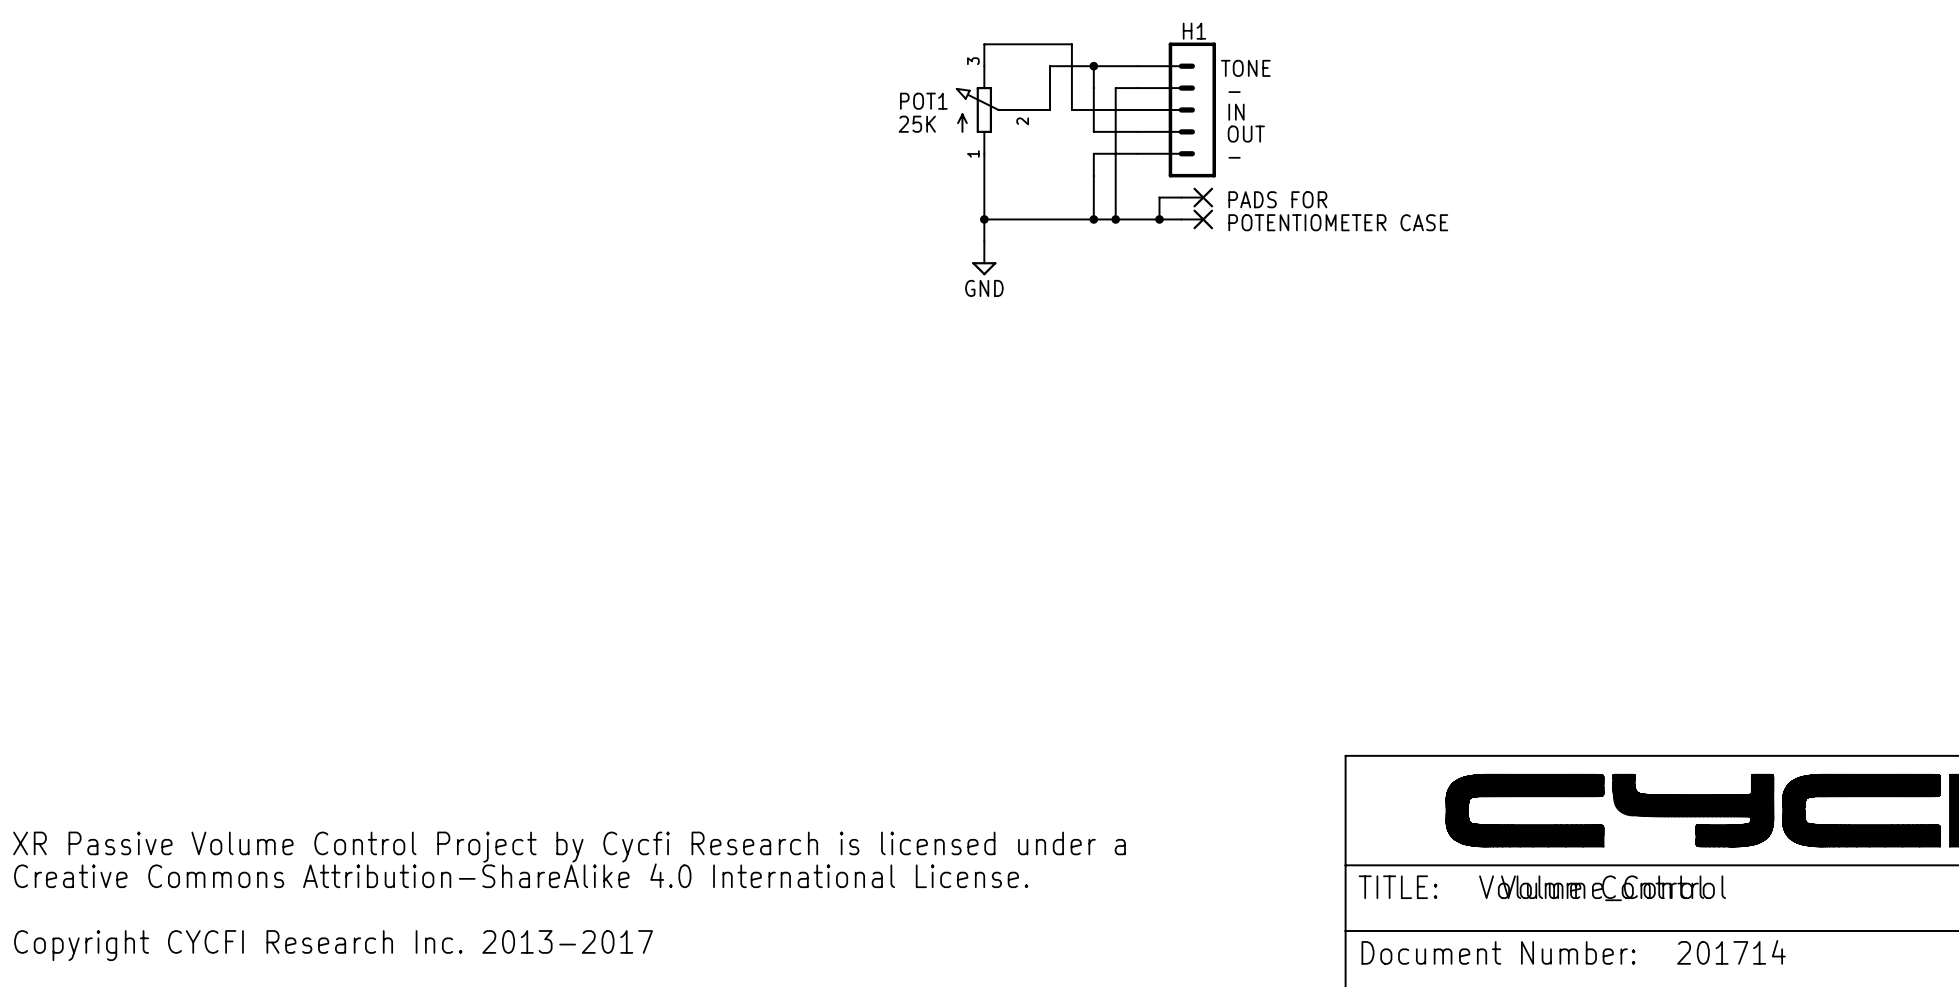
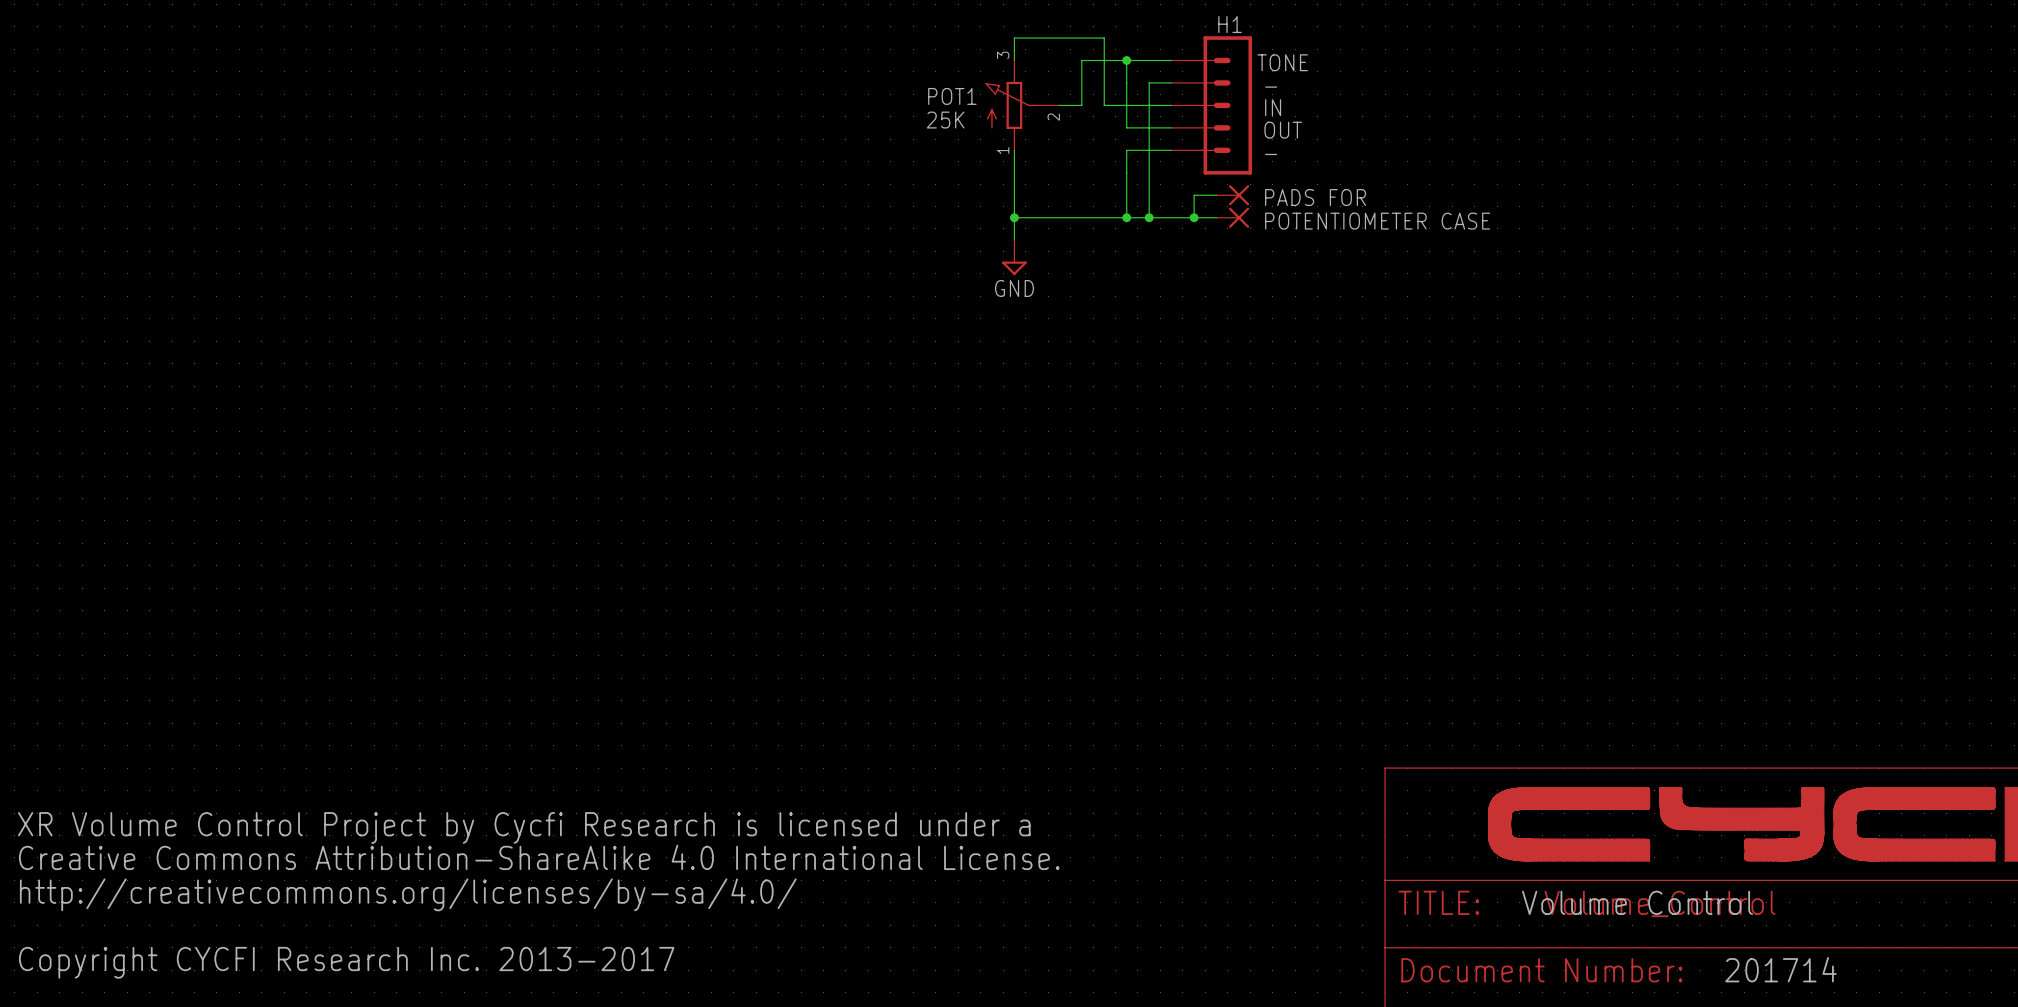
text: none -> XR Volume Control Project by Cycfi Research is licensed under a (524, 827)
text: XR Passive Volume Control Project by Cycfi Research is licensed under a (569, 847) -> Creative Commons Attribution-ShareAlike 4.0 International License. (539, 857)
text: Creative Commons Attribution-ShareAlike 4.0 International License. (521, 875) -> http://creativecommons.org/licenses/by-sa/4.0/ (408, 894)

